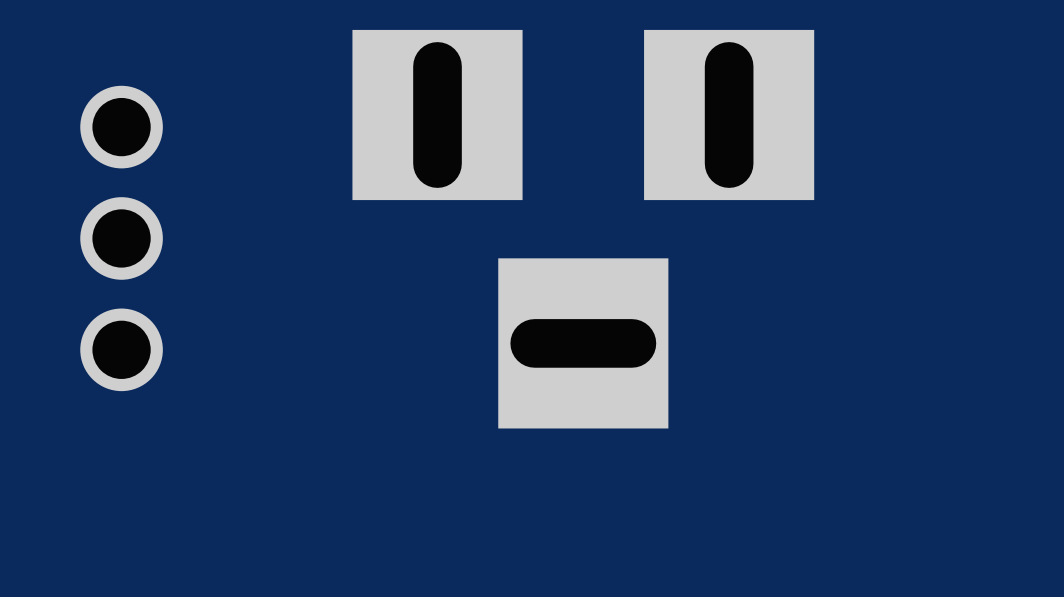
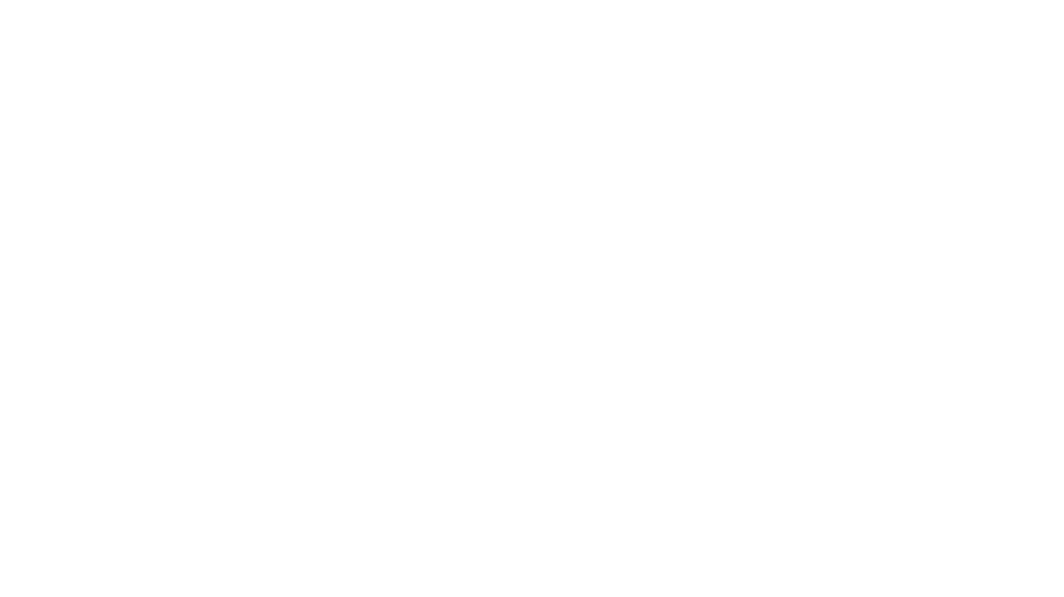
part: (583, 229) -> none
part: (121, 238) -> none

